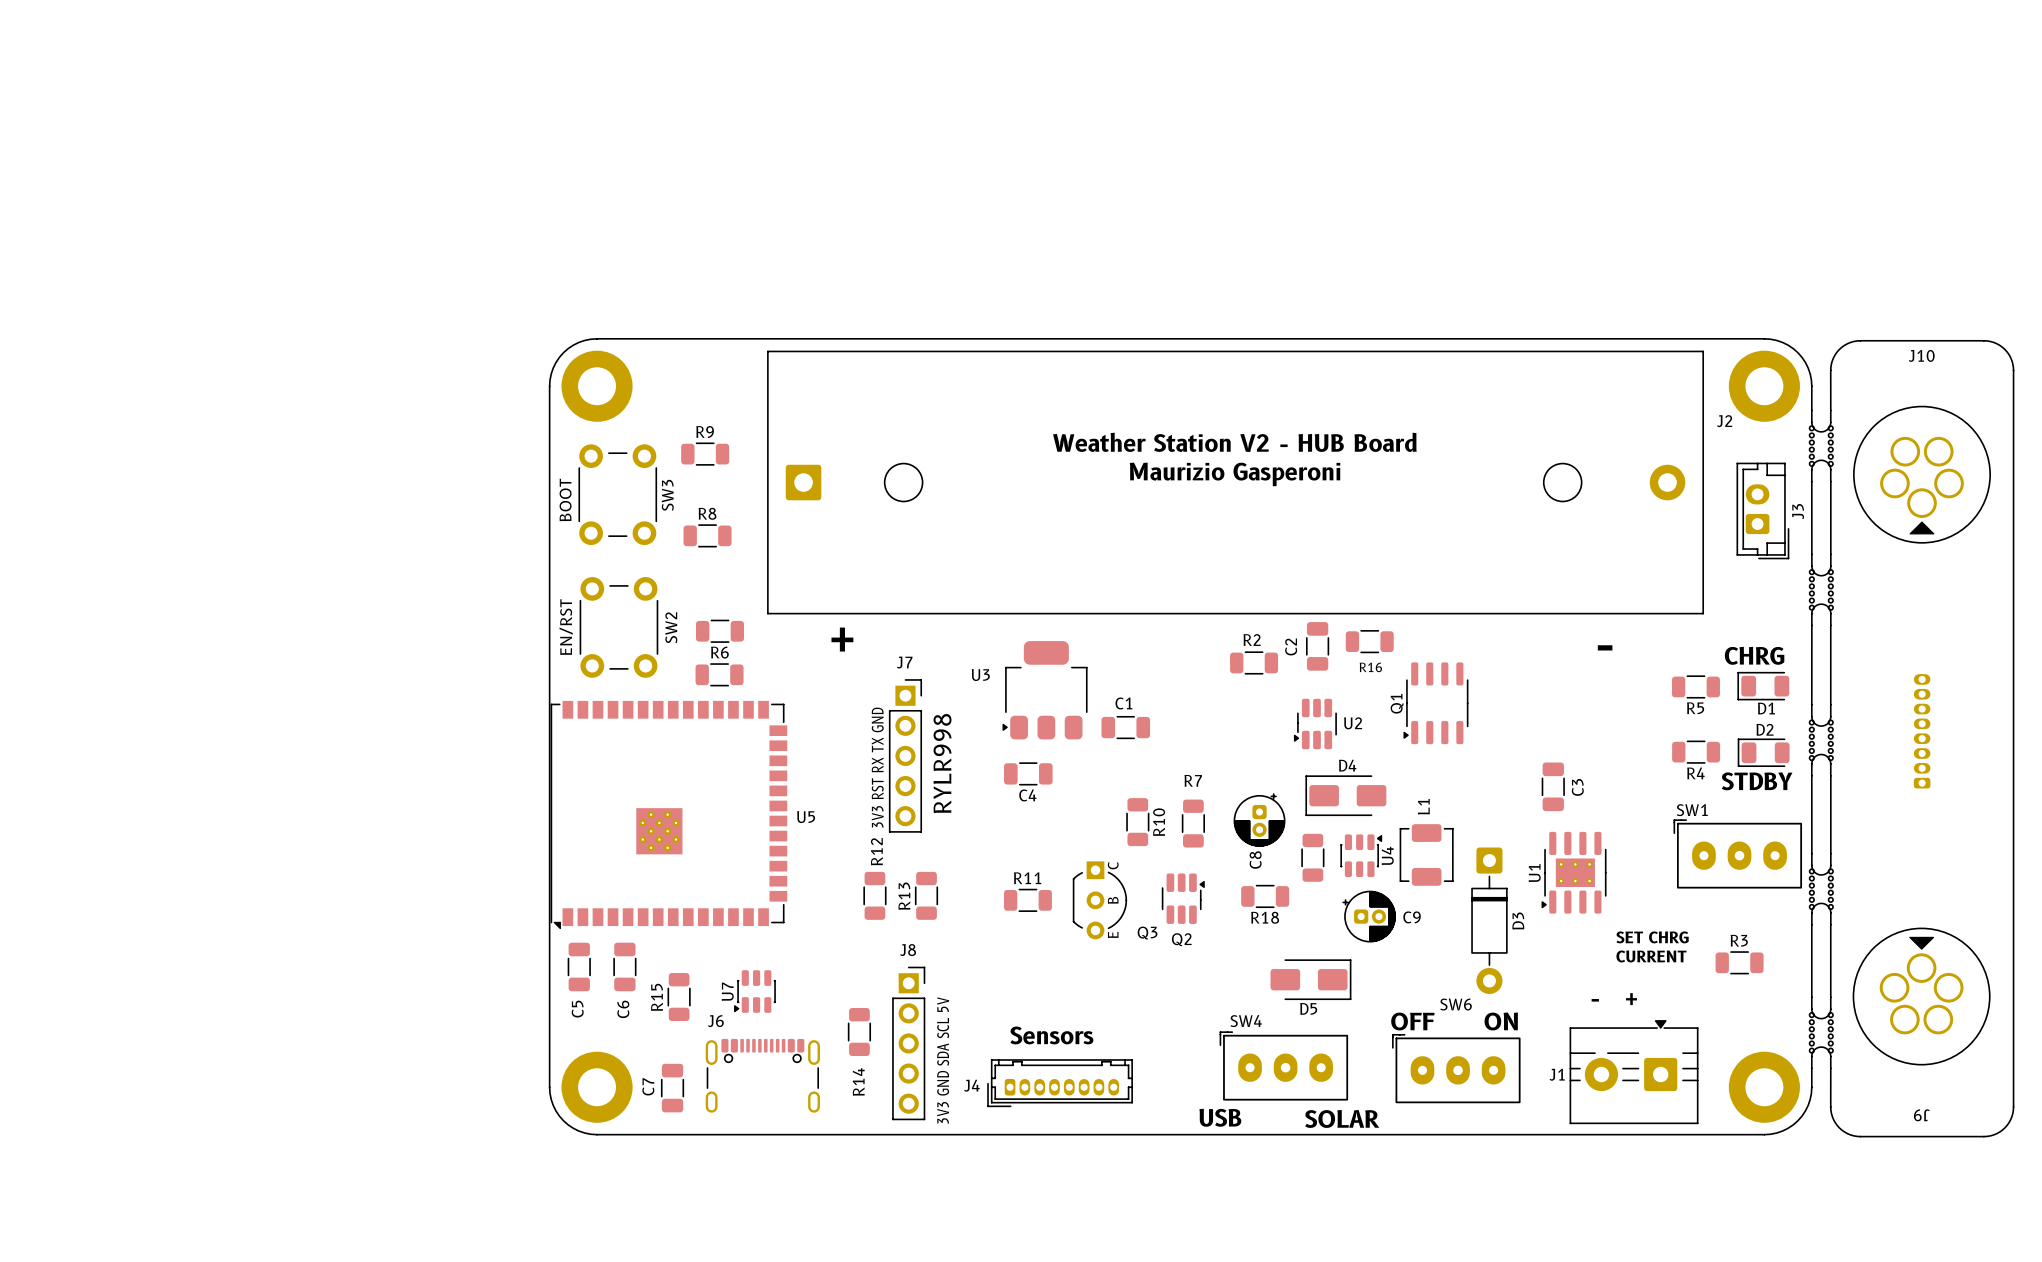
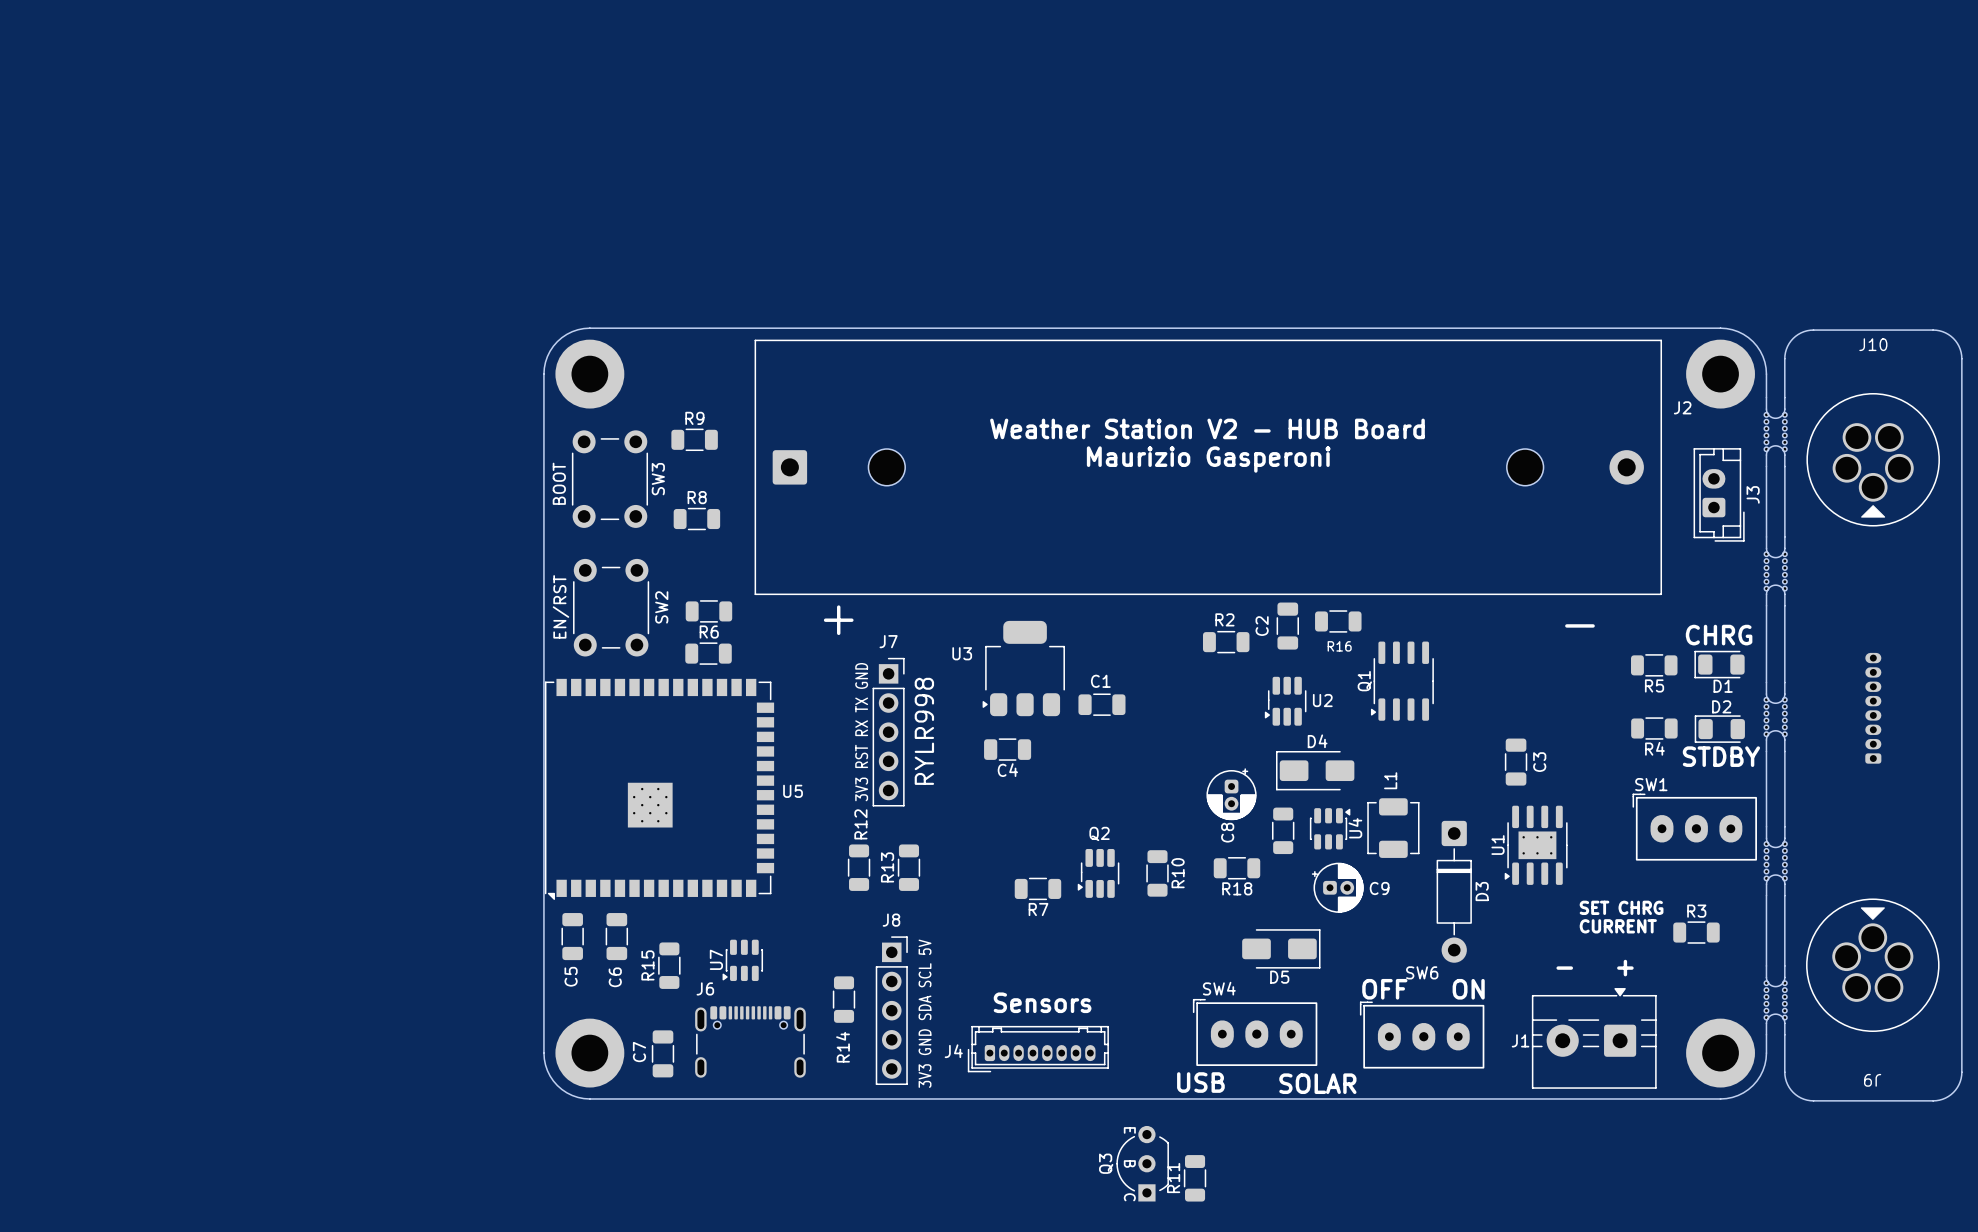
R7 name position: R7 (1193, 780) -> R7 (1038, 909)
R10 position: (1137, 822) -> (1157, 873)
R7 rotation: 0° (1193, 823) -> 90° clockwise (1037, 888)
R7 position: (1193, 823) -> (1037, 888)
R11 name position: R11 (1027, 878) -> R11 (1173, 1178)
Q2 rotation: 0° (1183, 898) -> 180° (1098, 873)
Q2 position: (1183, 898) -> (1098, 873)
R11 rotation: 0° (1027, 900) -> 90° clockwise (1195, 1178)
R11 position: (1027, 900) -> (1195, 1178)
Q3 rotation: 0° (1099, 900) -> 180° (1142, 1163)
Q3 position: (1099, 900) -> (1142, 1163)
Q3 name position: Q3 (1147, 933) -> Q3 (1106, 1163)

